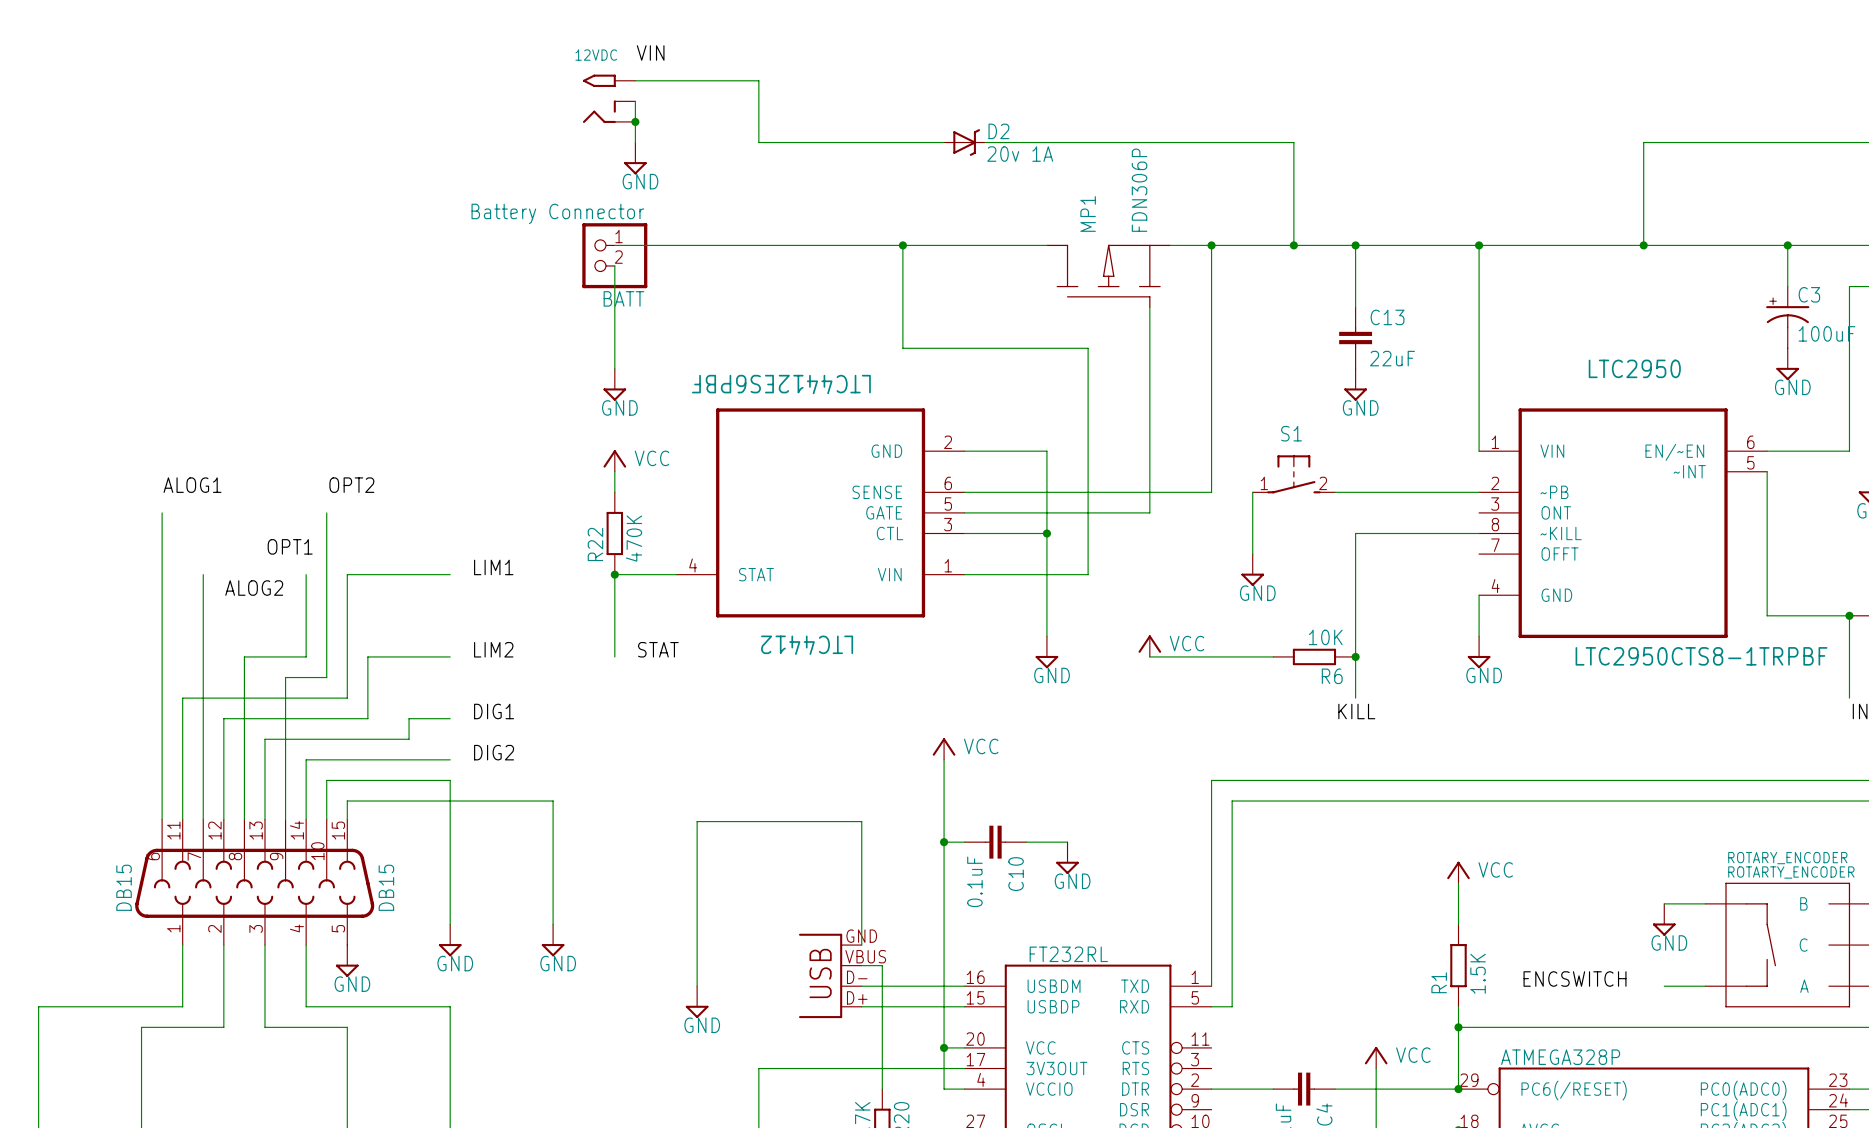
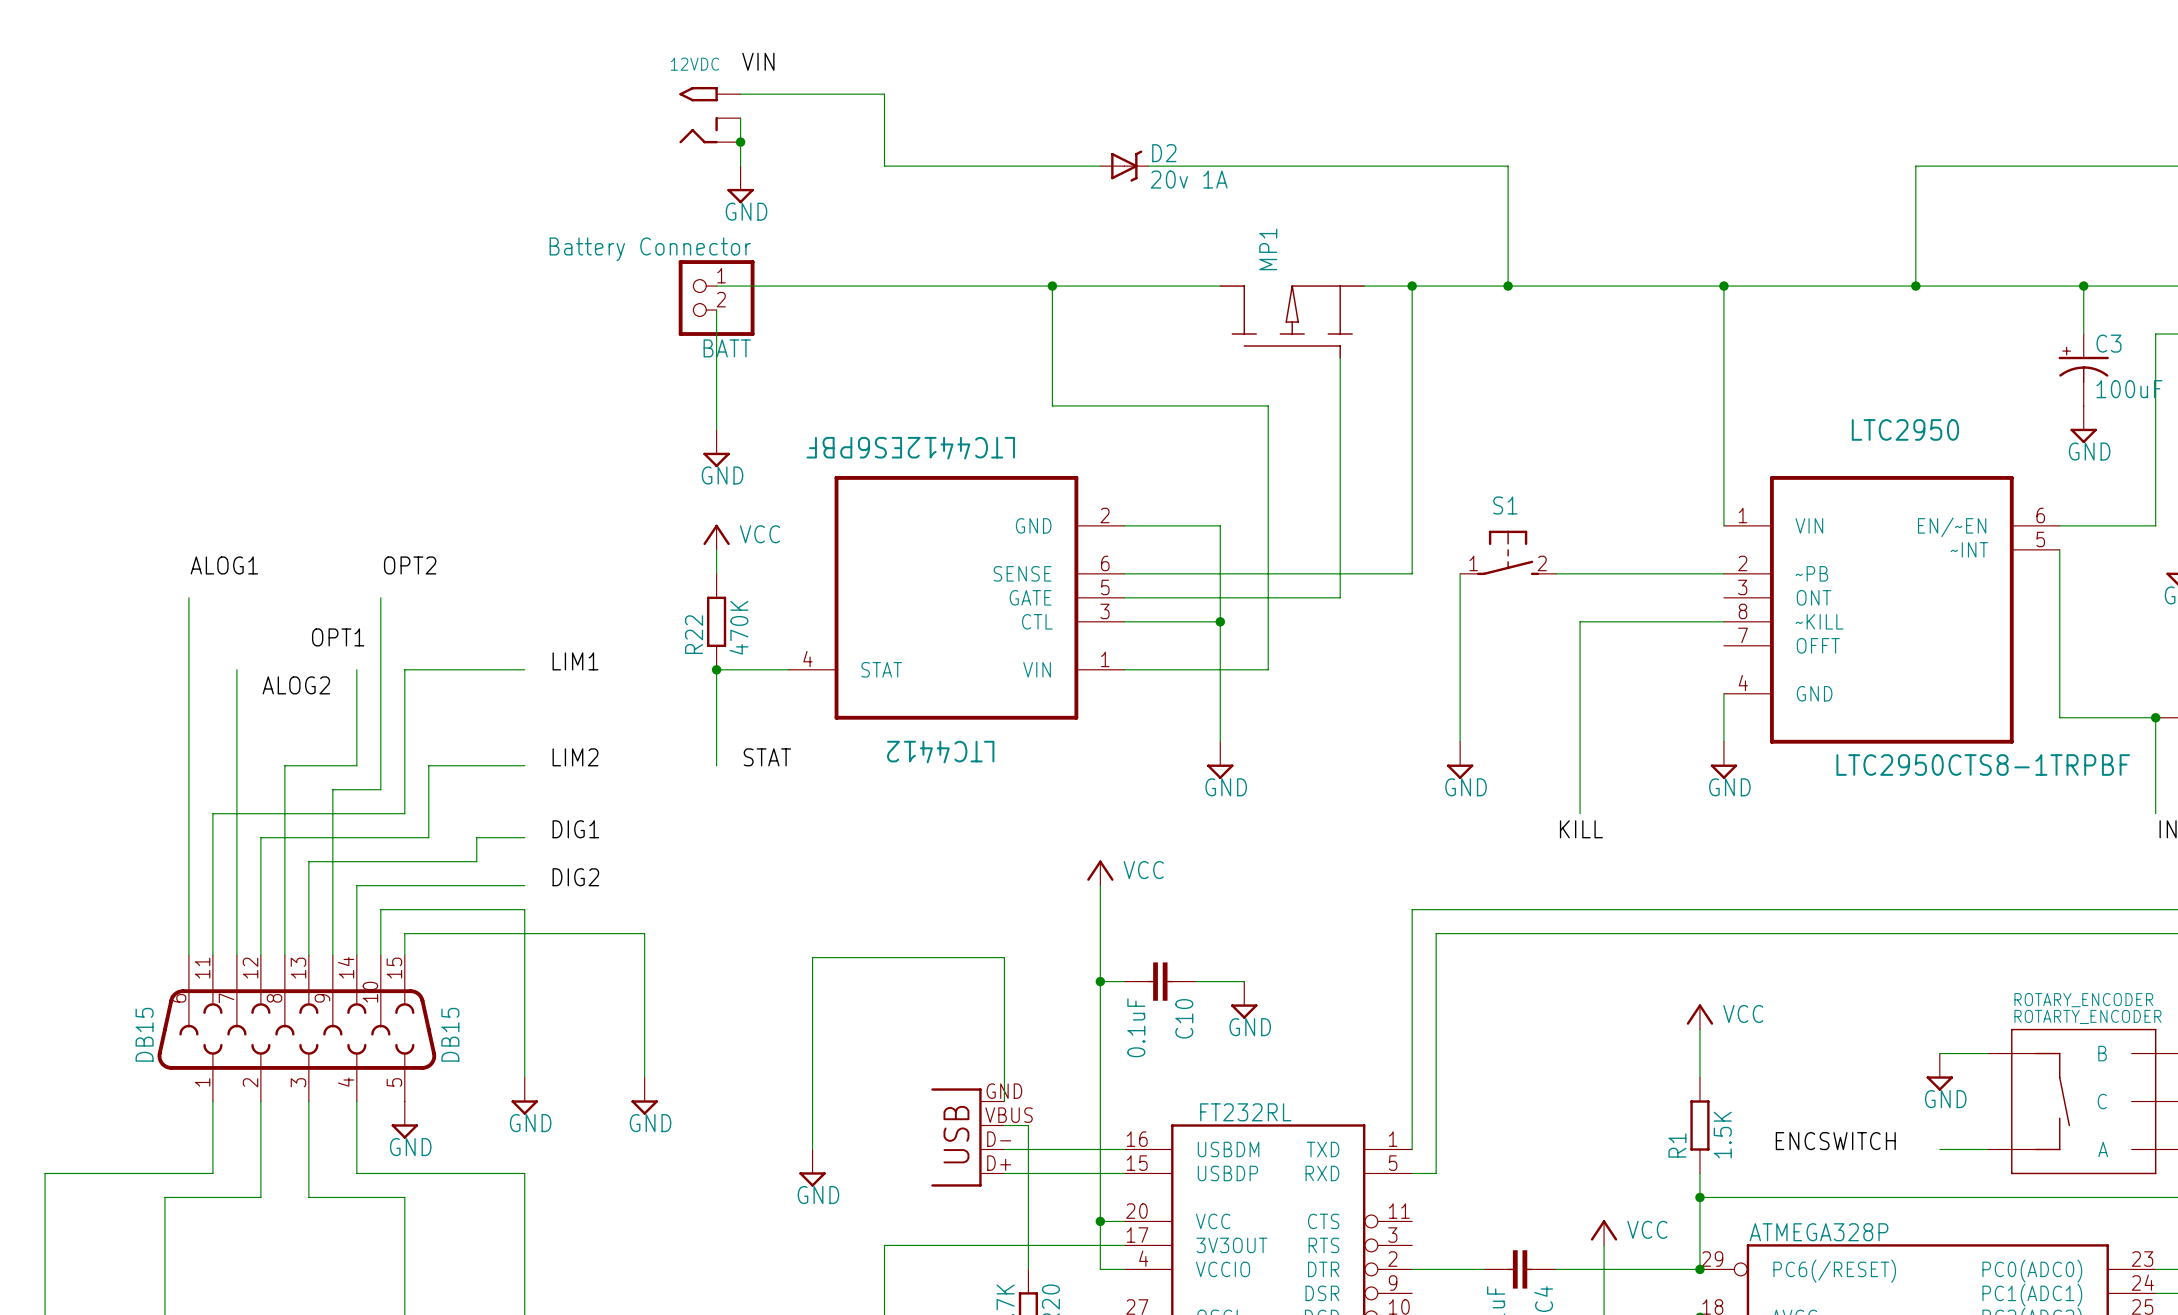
MP1 value: FDN306P (1139, 190) -> none
wire: (1355, 245) (1355, 307) -> none
junction: (1355, 245) -> none
C13: 22uF (1355, 338) -> none
power symbol: GND (1355, 384) -> none
wire: none -> (1460, 645) (1460, 741)
power symbol position: GND (1252, 570) -> GND (1460, 760)
power symbol: VCC (1149, 646) -> none
wire: (1149, 656) (1273, 656) -> none
R6: 10K (1314, 656) -> none
junction: (1355, 656) -> none

